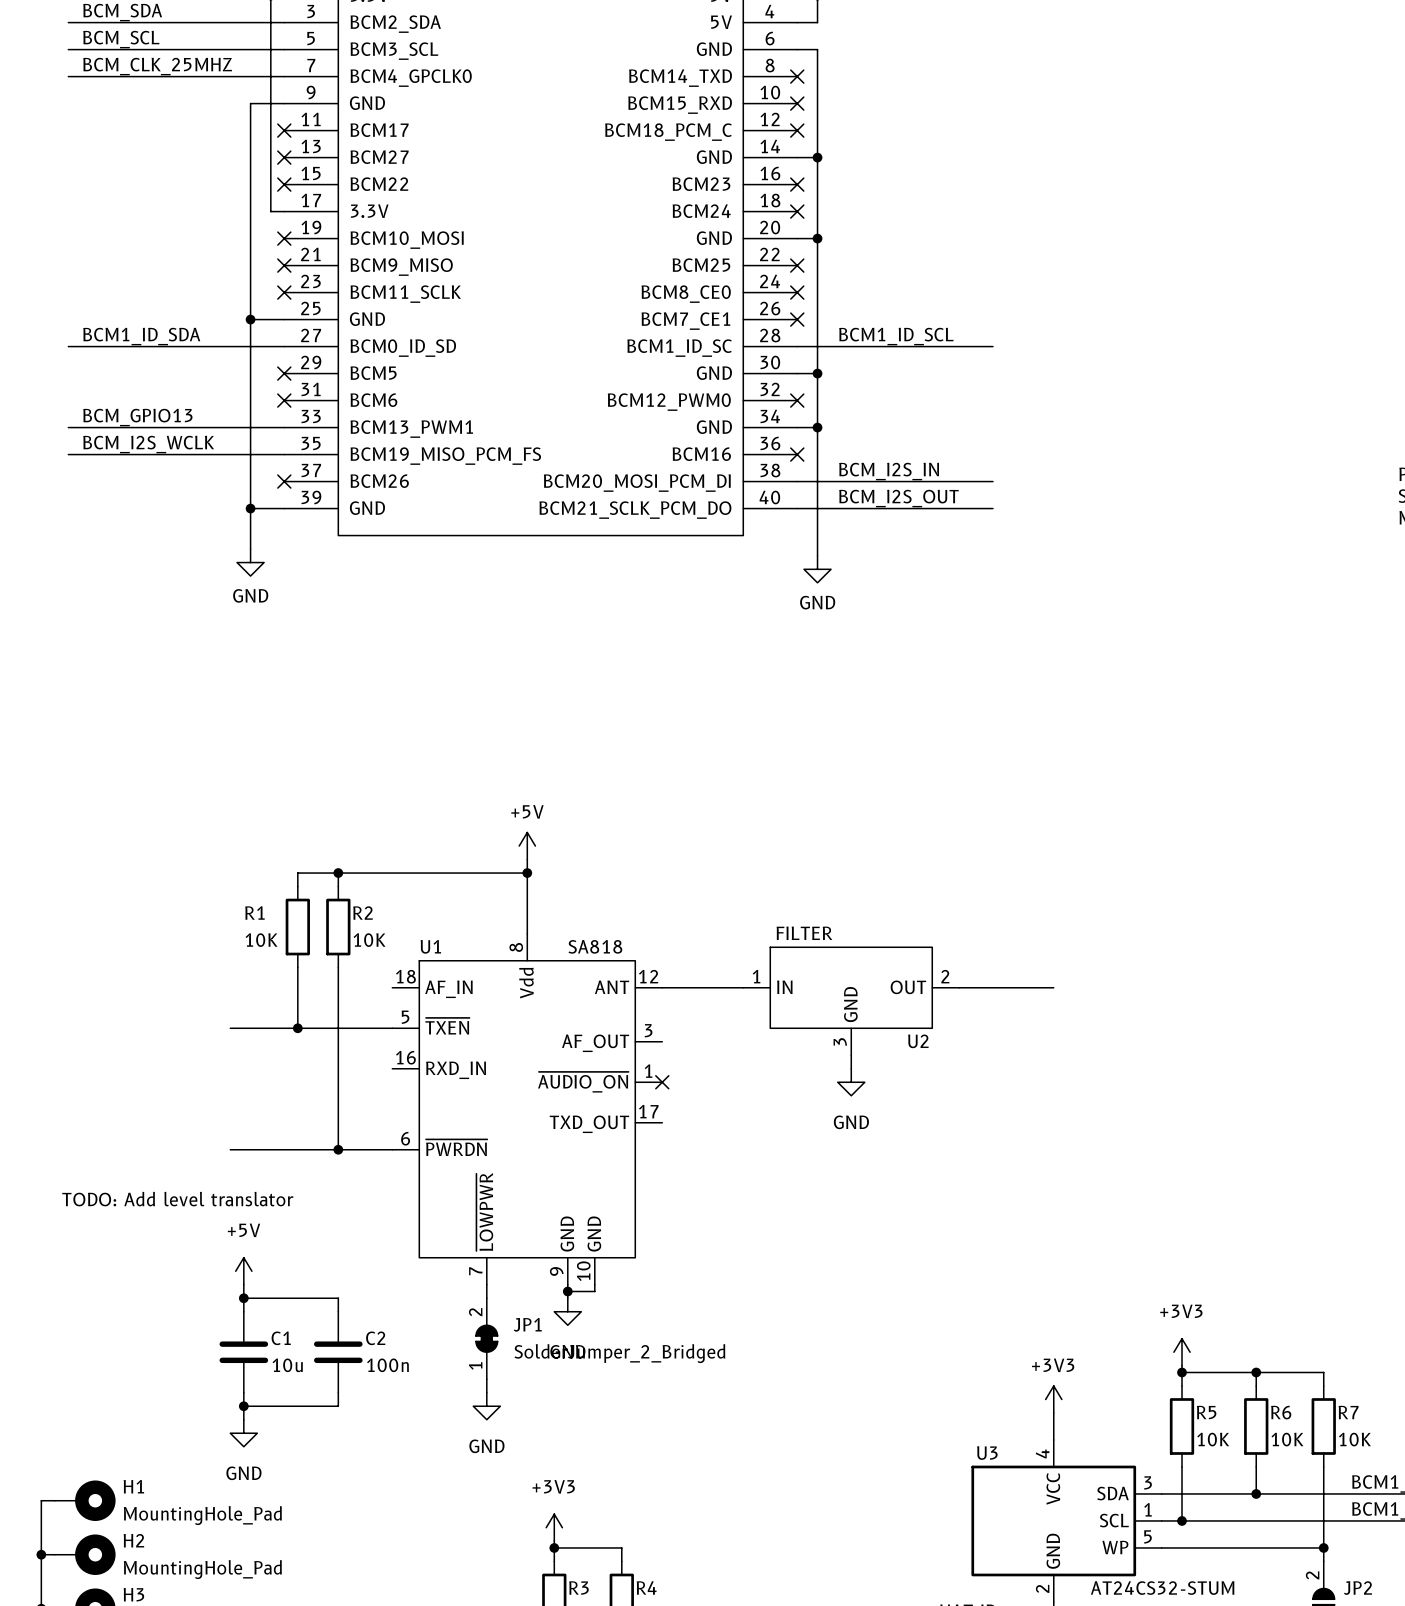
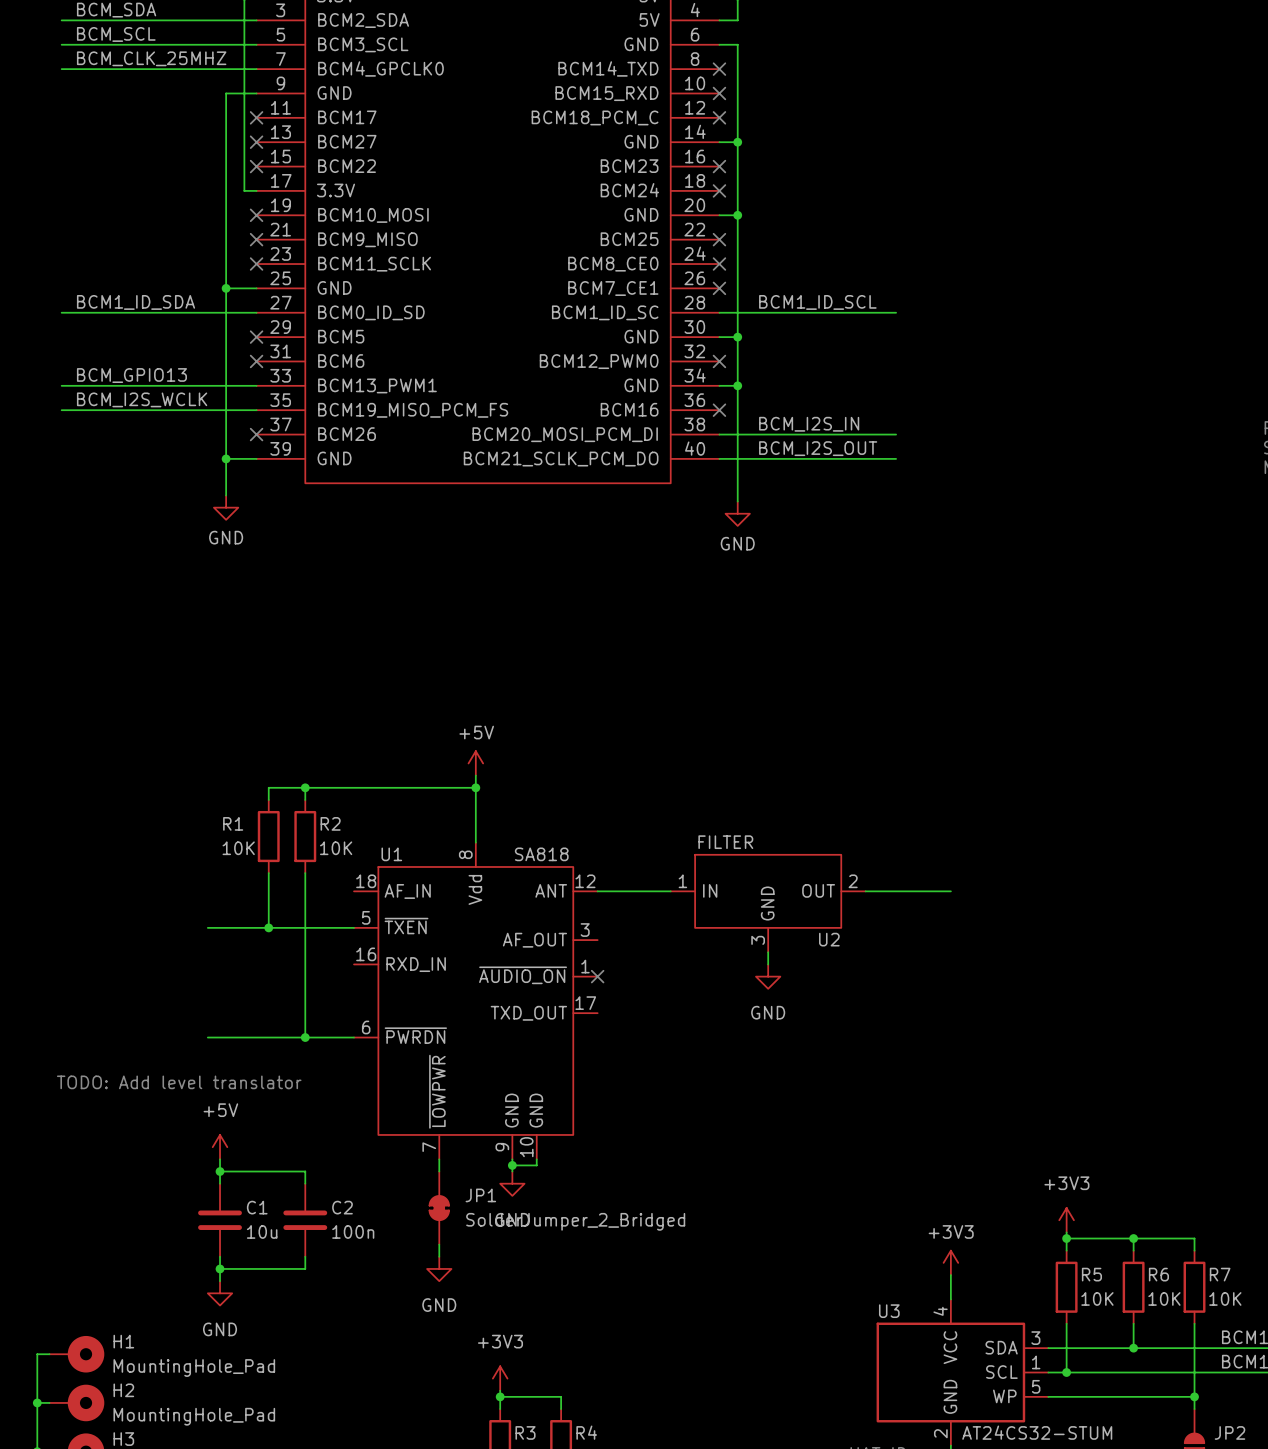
JP1 pin number: 2 (475, 1312) -> none
JP1 pin number: 1 (475, 1365) -> none
JP2 pin number: 2 (1312, 1575) -> none

